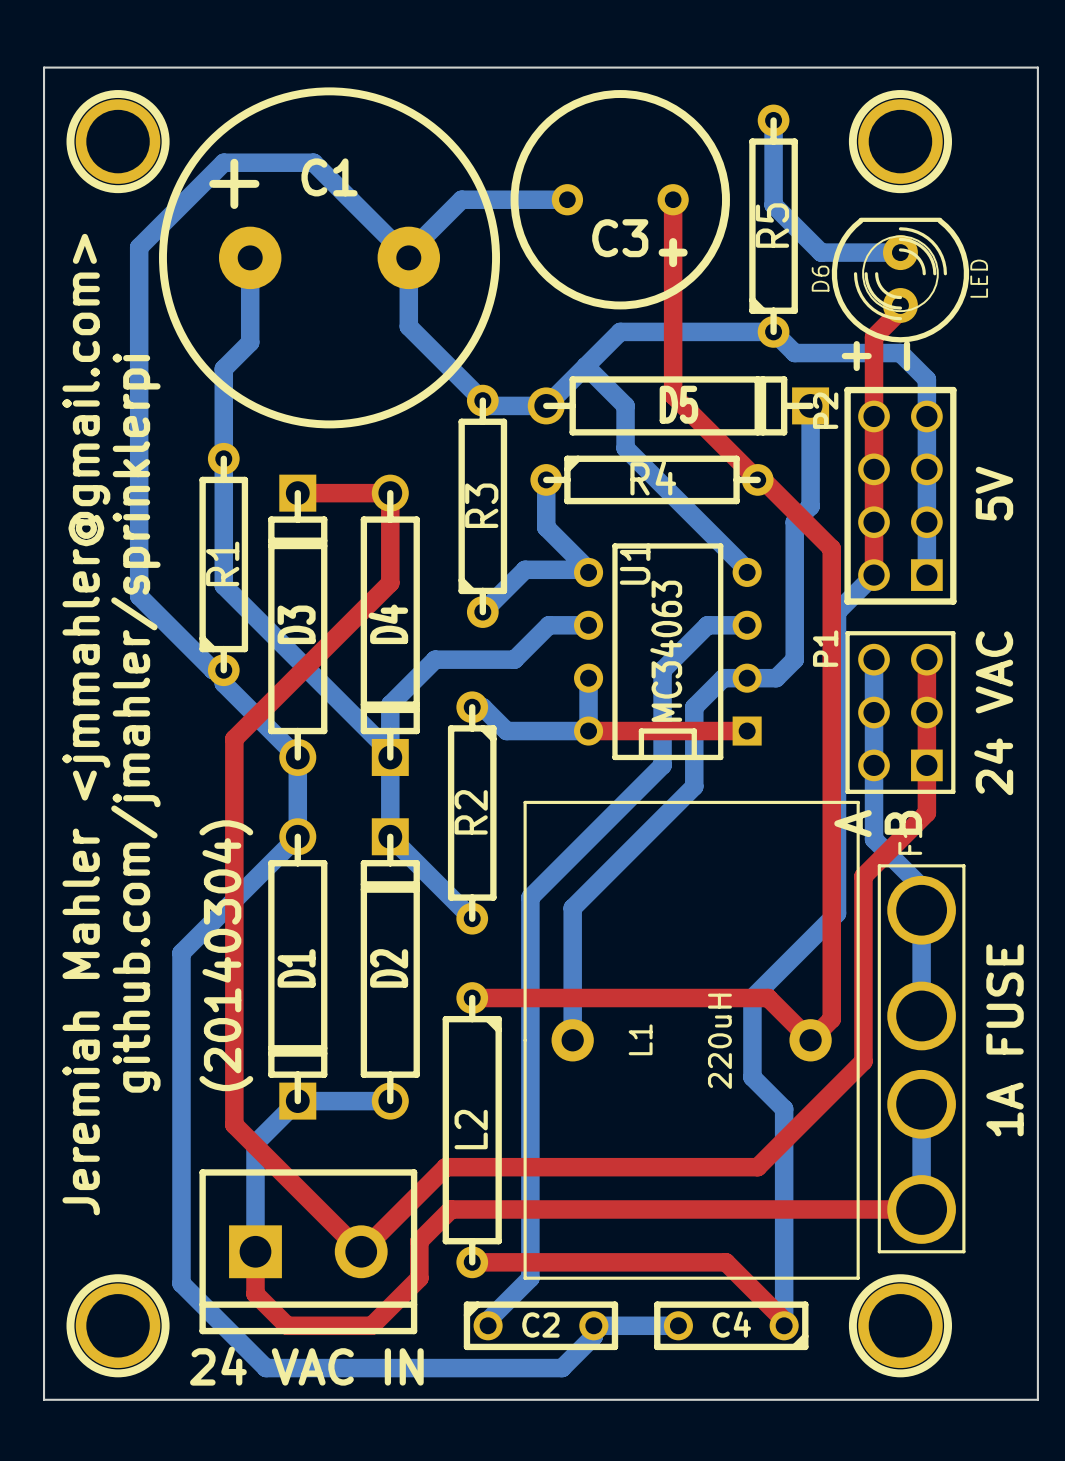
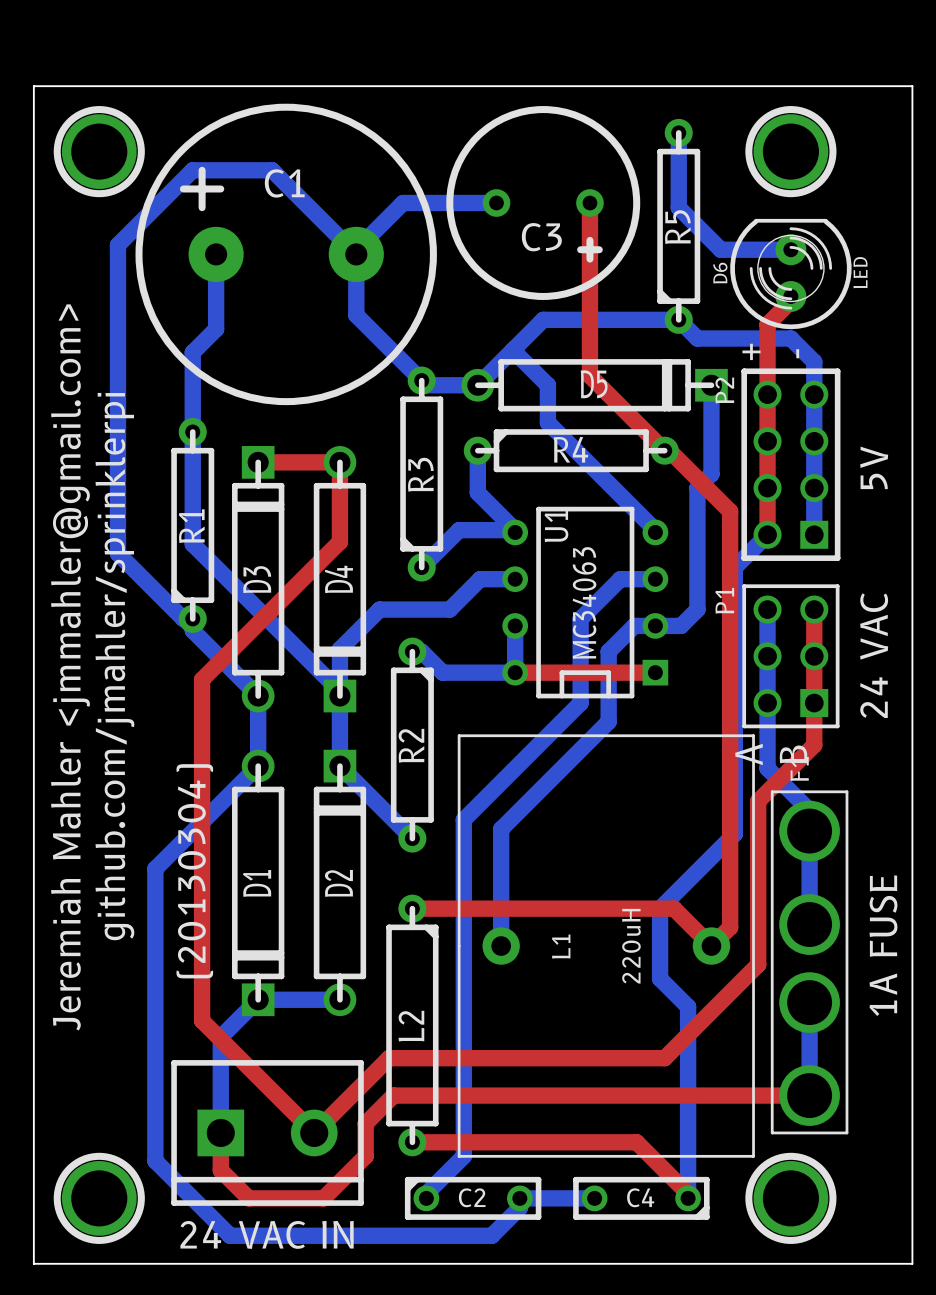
text: (20140304) (226, 955) -> (20130304) (194, 871)

